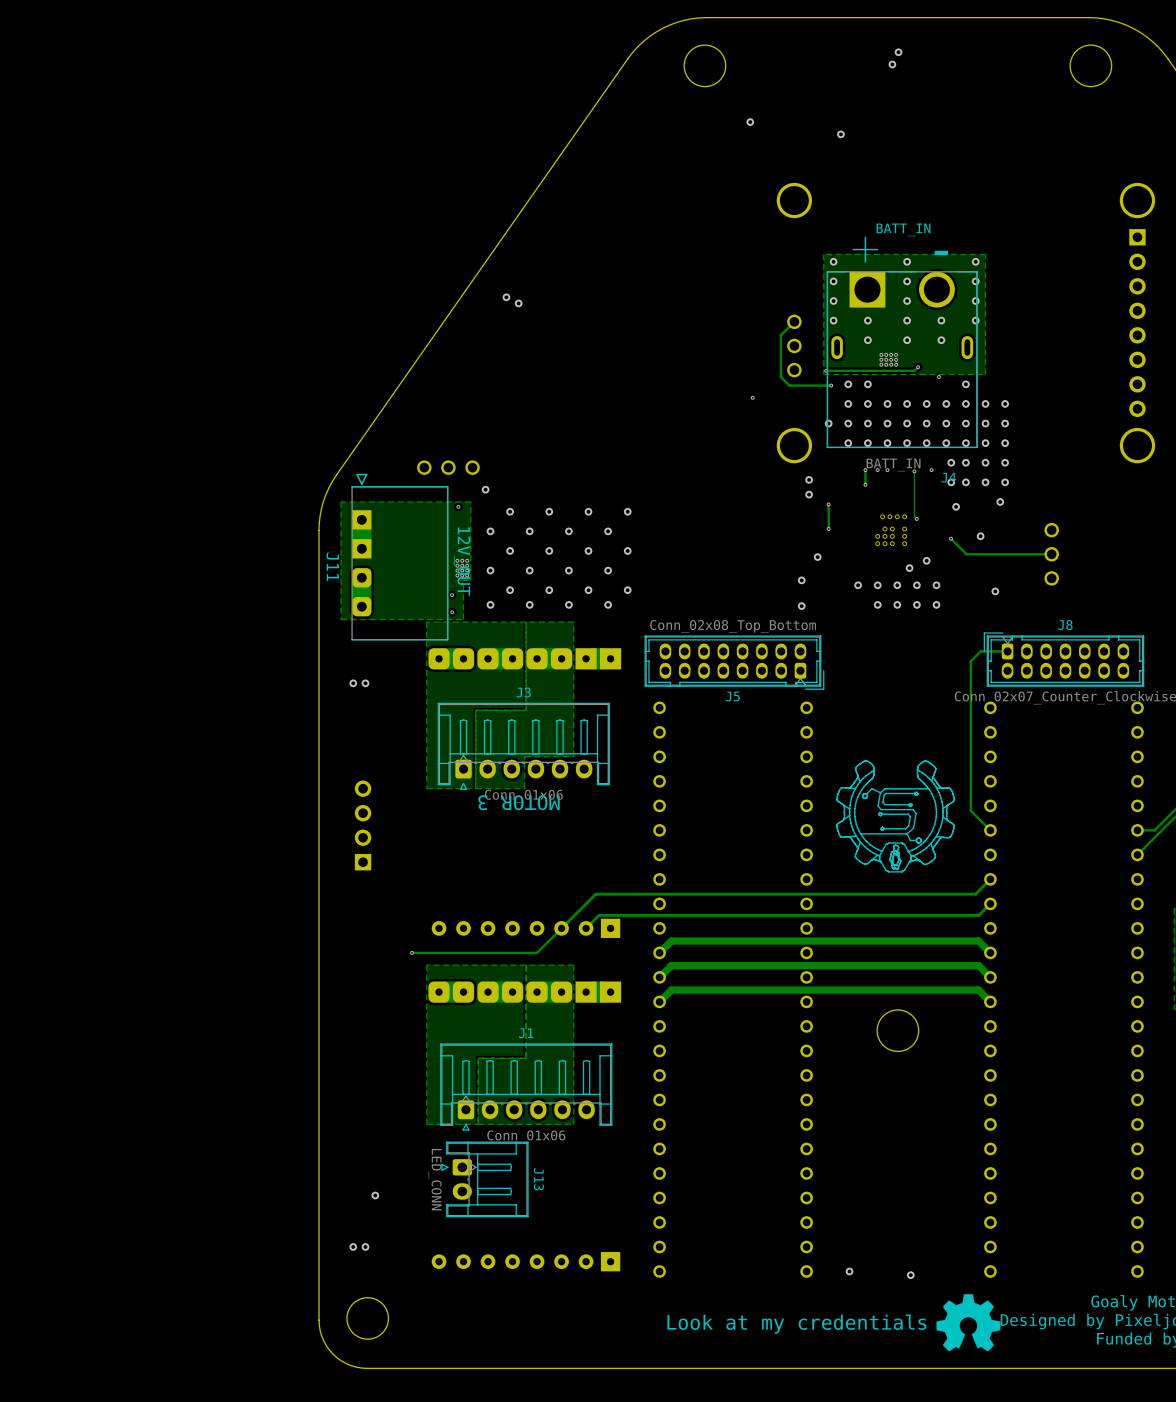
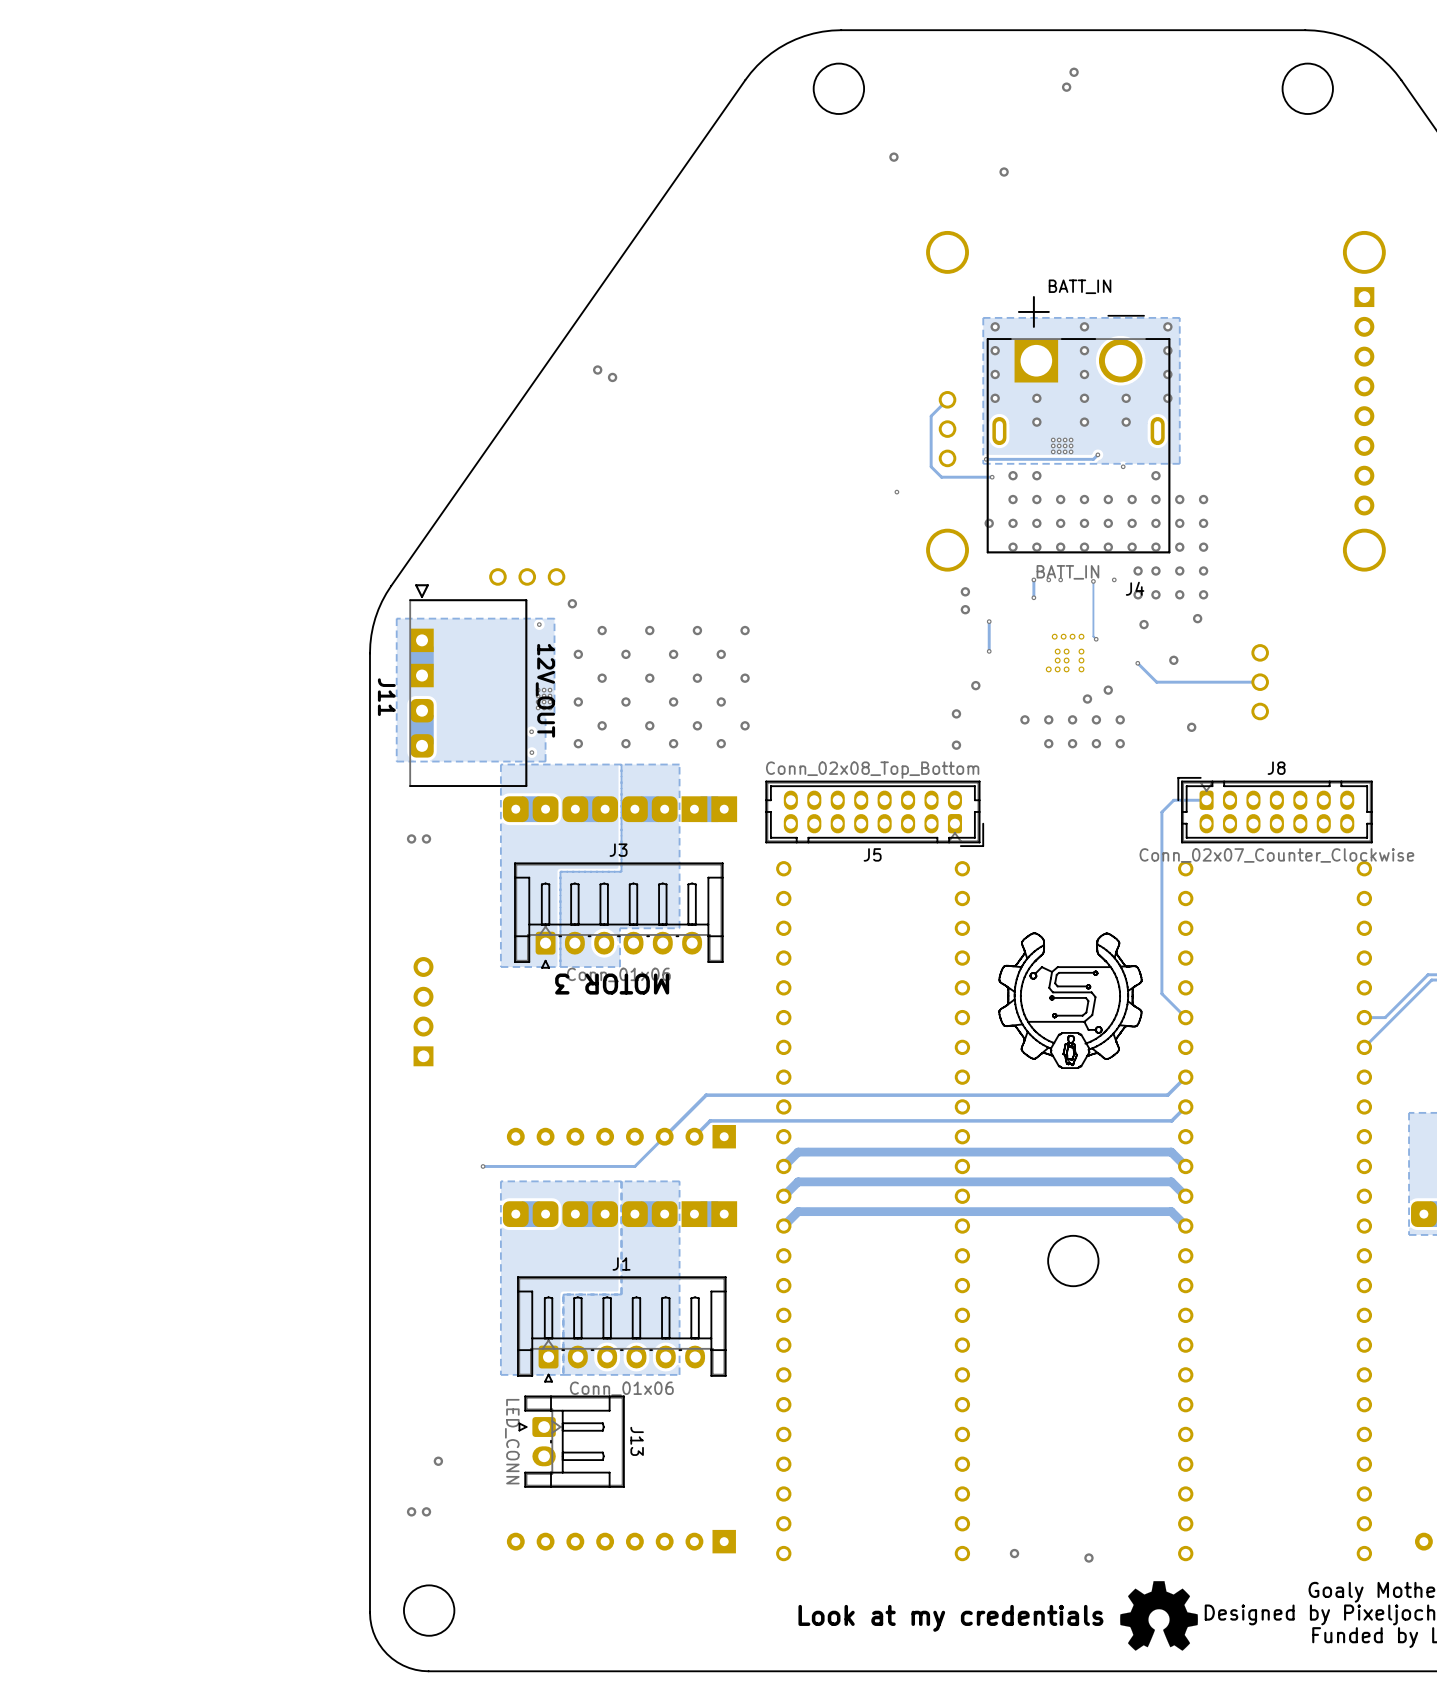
part footprint: [875, 514, 908, 547] -> [1045, 633, 1085, 673]
via: none -> (411, 1511)
via: none -> (426, 1511)
via: (353, 1246) -> none
via: (365, 1246) -> none

